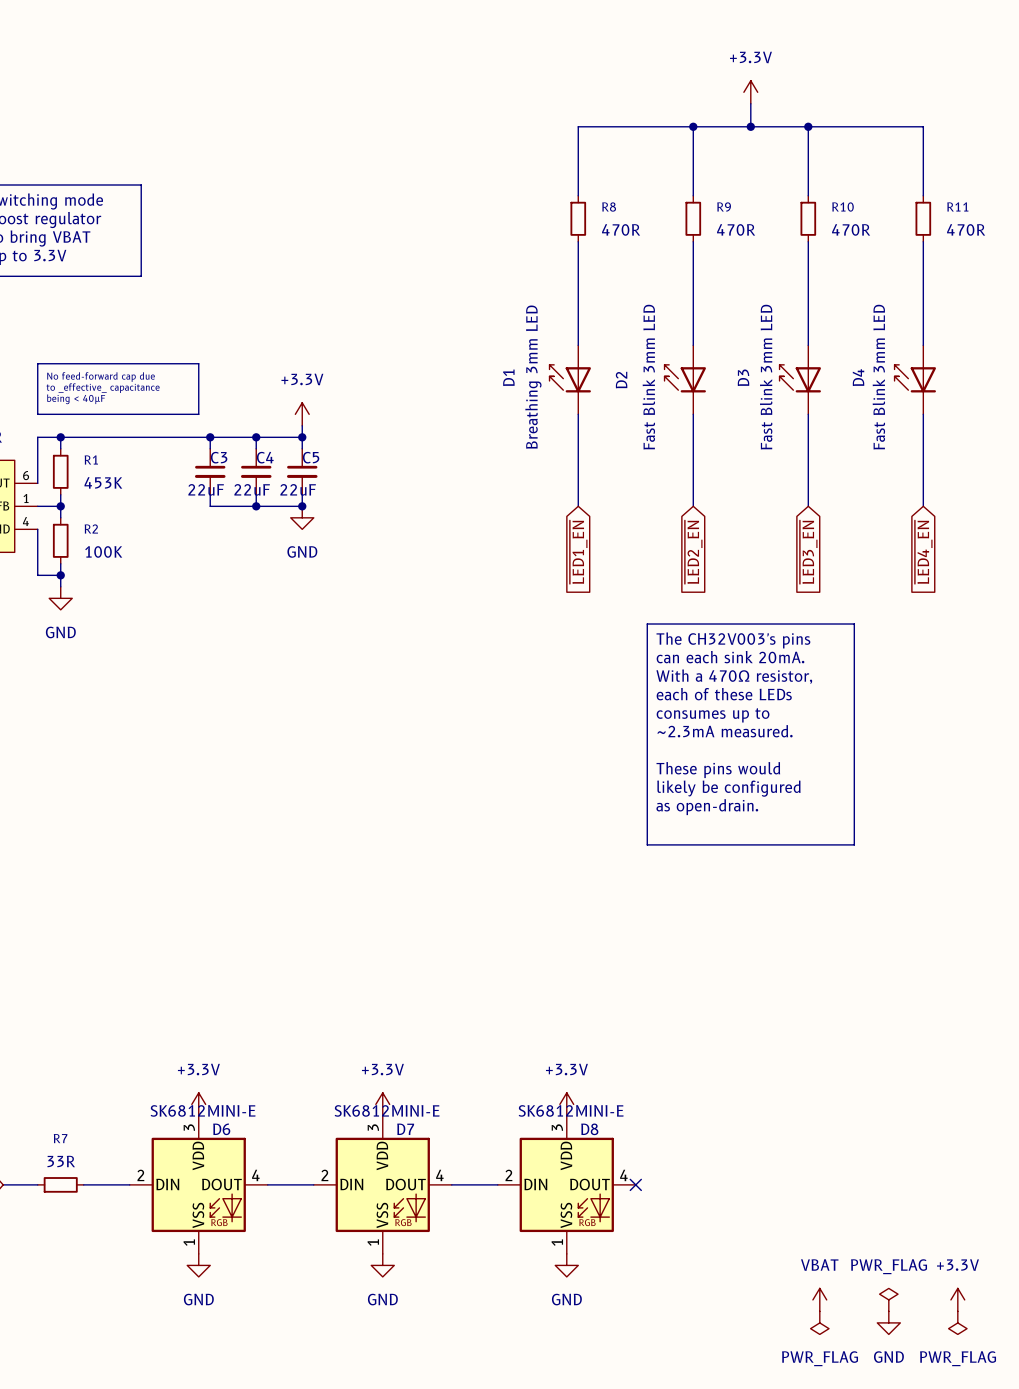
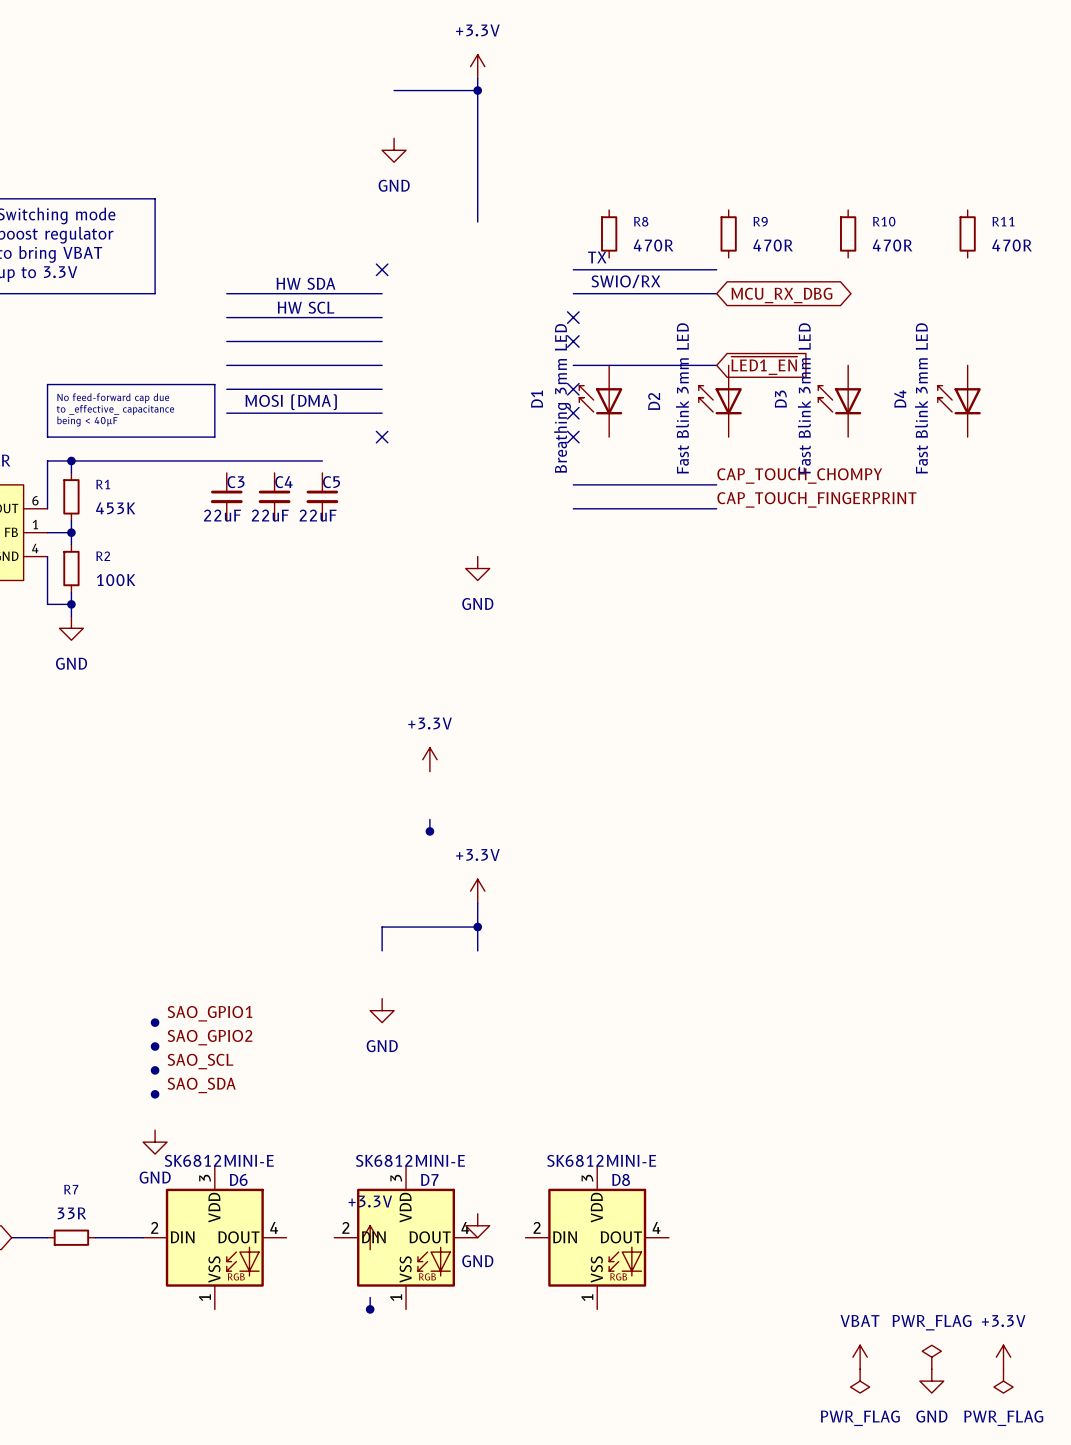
power symbol: none -> +3.3V (477, 66)
wire: none -> (477, 78) (477, 221)
wire: none -> (394, 90) (477, 90)
junction: none -> (477, 90)
power symbol: +3.3V (750, 92) -> none
wire: (750, 103) (750, 126) -> none
wire: (693, 126) (693, 195) -> none
junction: (693, 126) -> none
junction: (750, 126) -> none
wire: (808, 126) (808, 195) -> none
junction: (808, 126) -> none
power symbol: none -> GND (394, 150)
wire: (578, 195) (578, 126) (923, 126) (923, 195) -> none
text: none -> TX (597, 257)
wire: (578, 241) (578, 345) -> none
wire: (693, 241) (693, 345) -> none
wire: (808, 241) (808, 345) -> none
wire: (923, 241) (923, 345) -> none
no-connect mark: none -> (382, 269)
wire: none -> (573, 269) (716, 269)
text: none -> SWIO/RX (625, 281)
text: none -> HW SDA (305, 283)
wire: none -> (226, 293) (382, 293)
wire: none -> (573, 293) (716, 293)
global label: none -> MCU_RX_DBG (781, 295)
text: none -> HW SCL (305, 307)
wire: none -> (226, 317) (382, 317)
no-connect mark: none -> (573, 317)
wire: none -> (226, 341) (382, 341)
no-connect mark: none -> (573, 341)
wire: none -> (226, 365) (382, 365)
wire: none -> (573, 365) (716, 365)
wire: none -> (226, 389) (382, 389)
no-connect mark: none -> (573, 389)
text: none -> MOSI (DMA) (291, 402)
wire: none -> (226, 413) (382, 413)
no-connect mark: none -> (573, 413)
power symbol: +3.3V (302, 414) -> none
no-connect mark: none -> (382, 437)
no-connect mark: none -> (573, 437)
wire: (578, 414) (578, 506) -> none
wire: (693, 414) (693, 506) -> none
wire: (808, 414) (808, 506) -> none
wire: (923, 414) (923, 506) -> none
wire: (302, 425) (302, 448) -> none
wire: (210, 437) (210, 448) -> none
junction: (210, 437) -> none
wire: (256, 437) (256, 448) -> none
junction: (256, 437) -> none
junction: (302, 437) -> none
label: none -> CAP_TOUCH_CHOMPY (799, 476)
wire: none -> (573, 484) (716, 484)
label: none -> CAP_TOUCH_FINGERPRINT (816, 499)
wire: none -> (573, 508) (716, 508)
wire: (210, 494) (210, 506) (302, 506) (302, 494) -> none
wire: (256, 494) (256, 506) -> none
junction: (256, 506) -> none
junction: (302, 506) -> none
power symbol position: GND (302, 517) -> GND (477, 568)
global label rotation: 0° (578, 552) -> 90° counterclockwise (764, 365)
global label position: ~{LED1_EN} (578, 552) -> ~{LED1_EN} (764, 365)
global label: ~{LED2_EN} (693, 552) -> none
global label: ~{LED3_EN} (808, 552) -> none
global label: ~{LED4_EN} (923, 552) -> none
line: (647, 624) (854, 624) (854, 844) (647, 844) (647, 624) -> none
text: The CH32V003's pins (733, 640) -> none
text: can each sink 20mA. (730, 657) -> none
text: With a 470Ω resistor, (734, 676) -> none
text: each of these LEDs (724, 694) -> none
text: consumes up to (713, 715) -> none
power symbol: none -> +3.3V (429, 759)
text: ~2.3mA measured. (724, 731) -> none
text: These pins would (718, 770) -> none
wire: none -> (429, 819) (429, 831)
text: likely be configured (728, 788) -> none
junction: none -> (429, 831)
text: as open-drain. (707, 807) -> none
power symbol: none -> +3.3V (477, 891)
wire: none -> (477, 903) (477, 950)
wire: none -> (477, 927) (382, 927) (382, 950)
junction: none -> (477, 927)
power symbol: none -> GND (382, 1010)
label: none -> SAO_GPIO1 (209, 1013)
junction: none -> (155, 1022)
label: none -> SAO_GPIO2 (210, 1037)
junction: none -> (155, 1046)
label: none -> SAO_SCL (200, 1061)
junction: none -> (155, 1070)
label: none -> SAO_SDA (201, 1085)
junction: none -> (155, 1094)
power symbol: none -> GND (155, 1142)
power symbol: +3.3V (198, 1104) -> none
power symbol: +3.3V (382, 1104) -> none
power symbol: +3.3V (566, 1104) -> none
power symbol: none -> GND (477, 1225)
wire: (267, 1184) (313, 1184) -> none
power symbol: none -> +3.3V (370, 1237)
wire: (451, 1184) (497, 1184) -> none
no-connect mark: (635, 1184) -> none
wire: none -> (370, 1297) (370, 1309)
junction: none -> (370, 1309)
power symbol: GND (198, 1265) -> none
power symbol: GND (382, 1265) -> none
power symbol: GND (566, 1265) -> none

